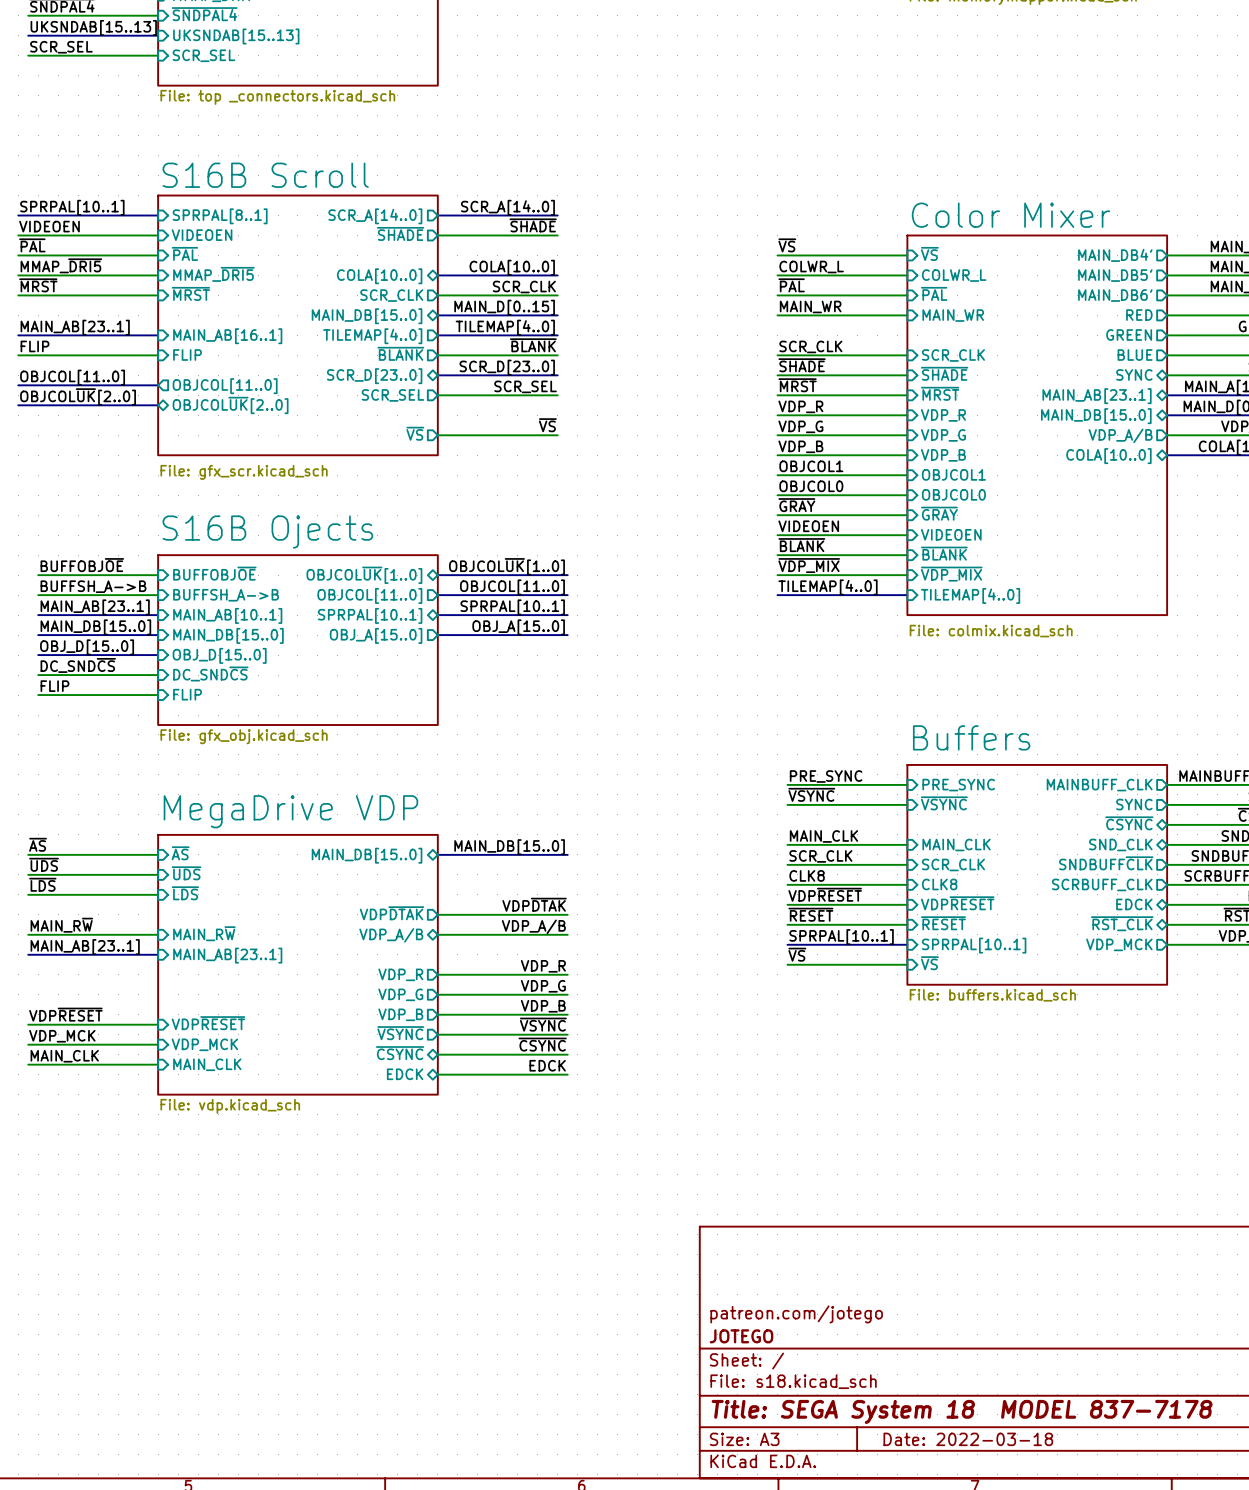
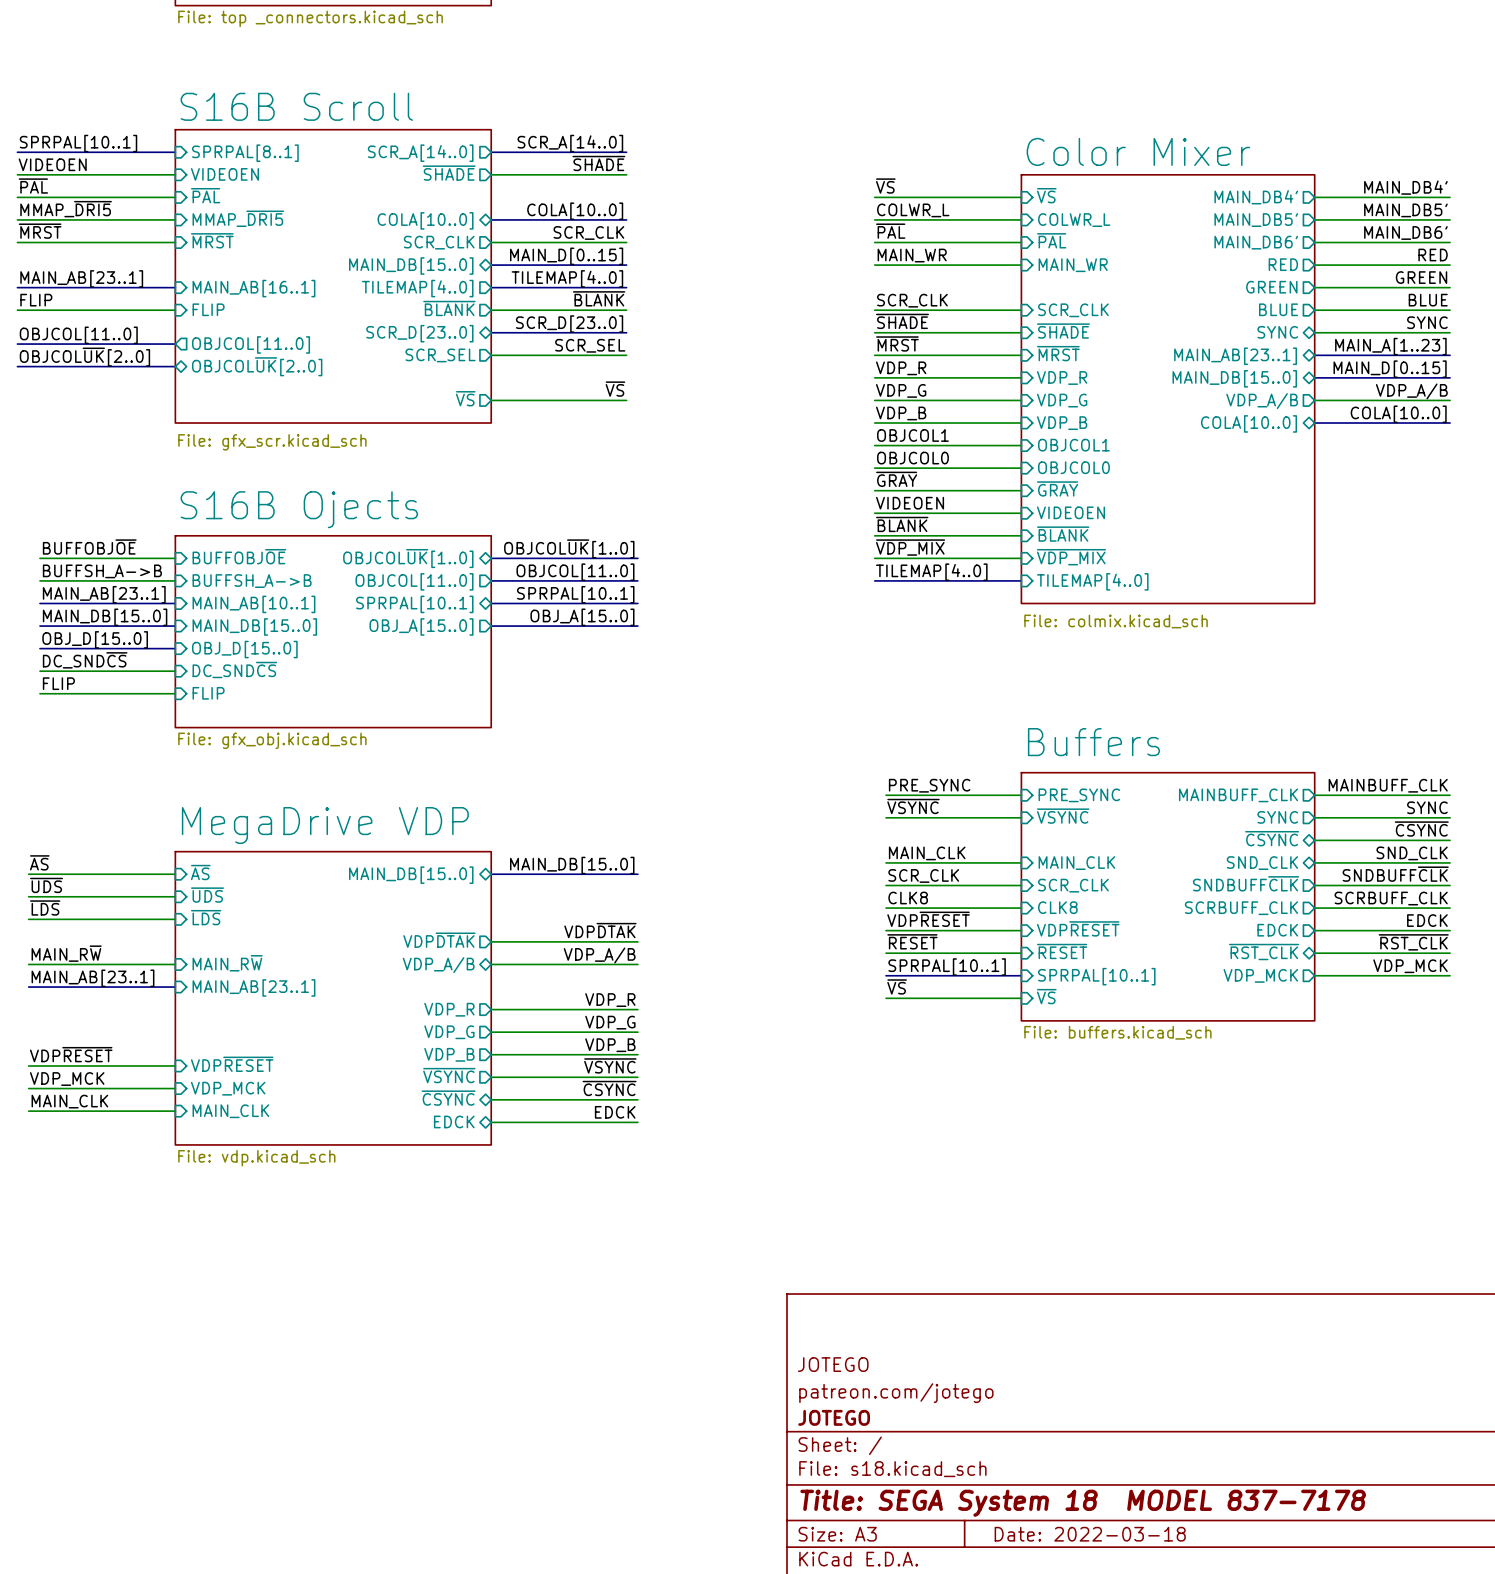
sheet pin shape: bidirectional (1134, 904) -> output (1277, 930)
title block: none -> JOTEGO (833, 1364)

